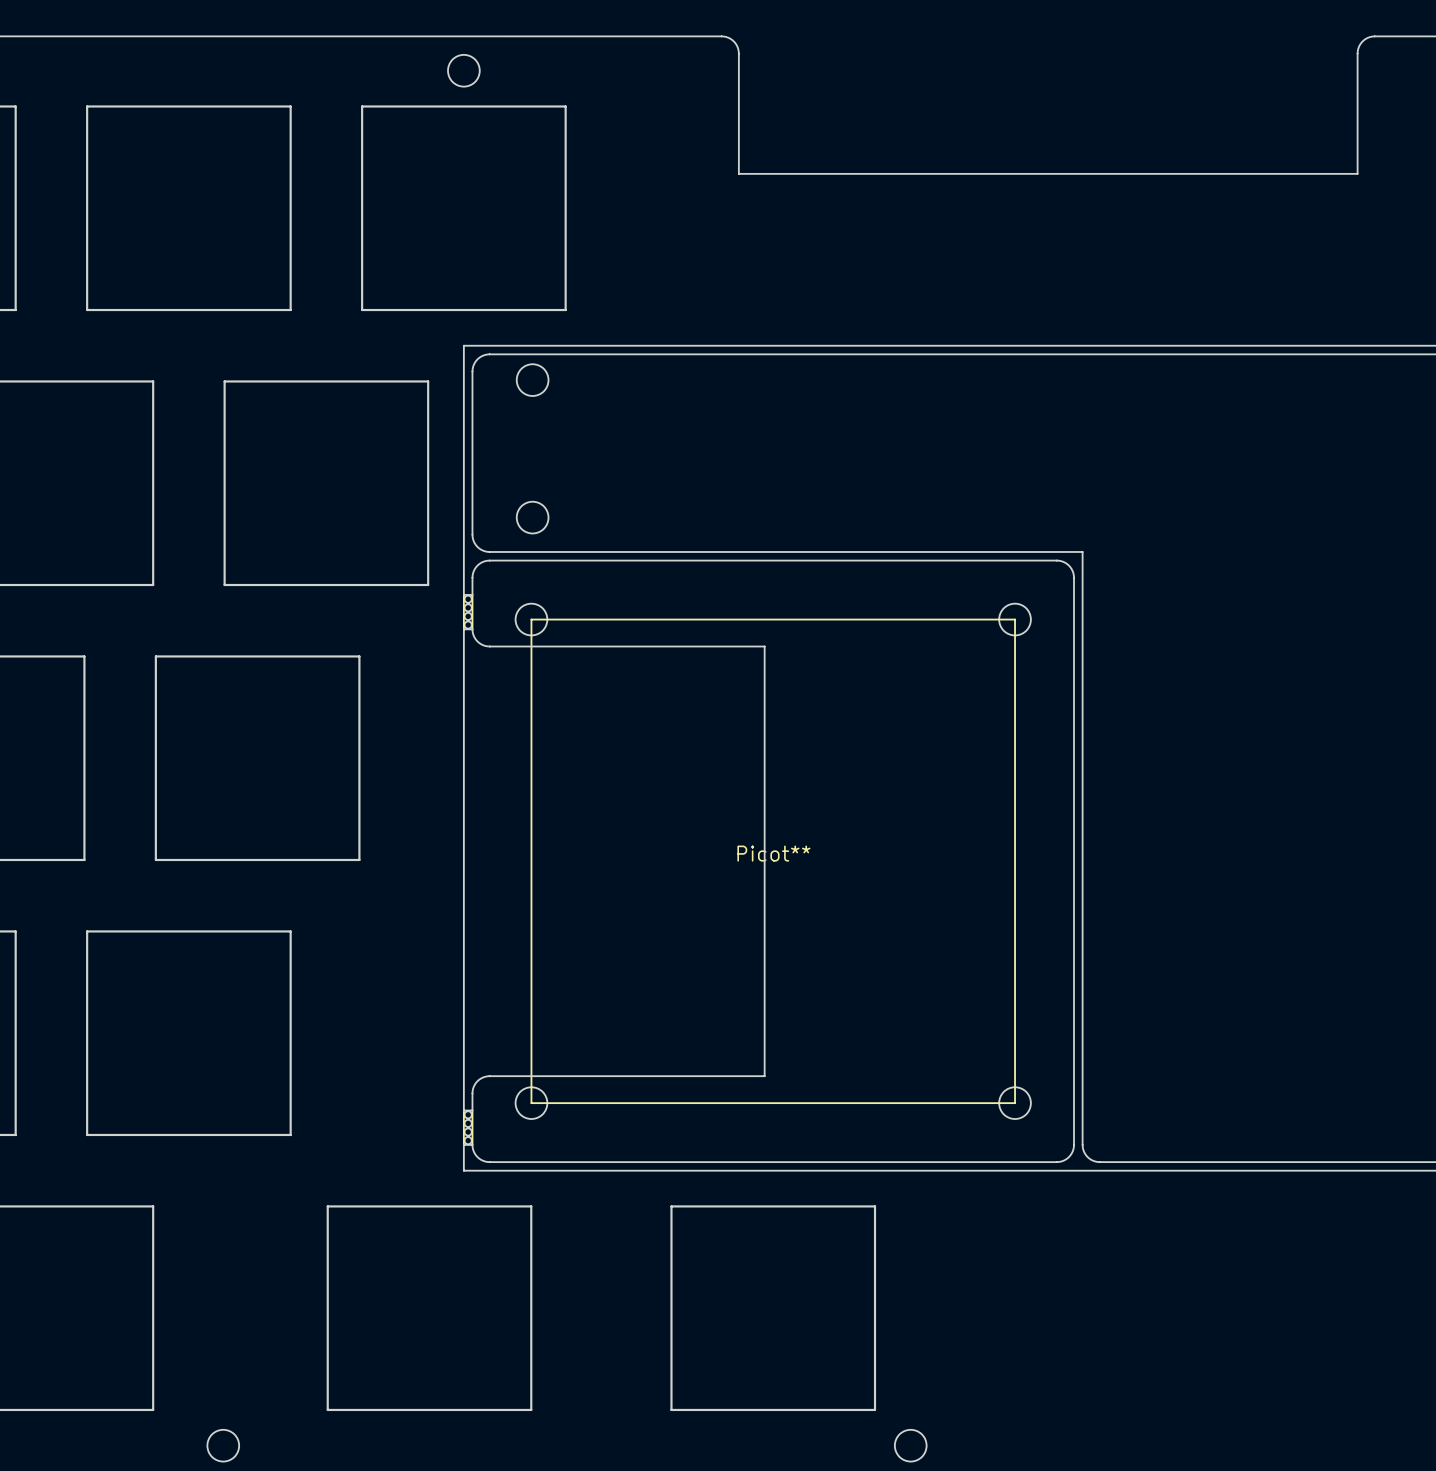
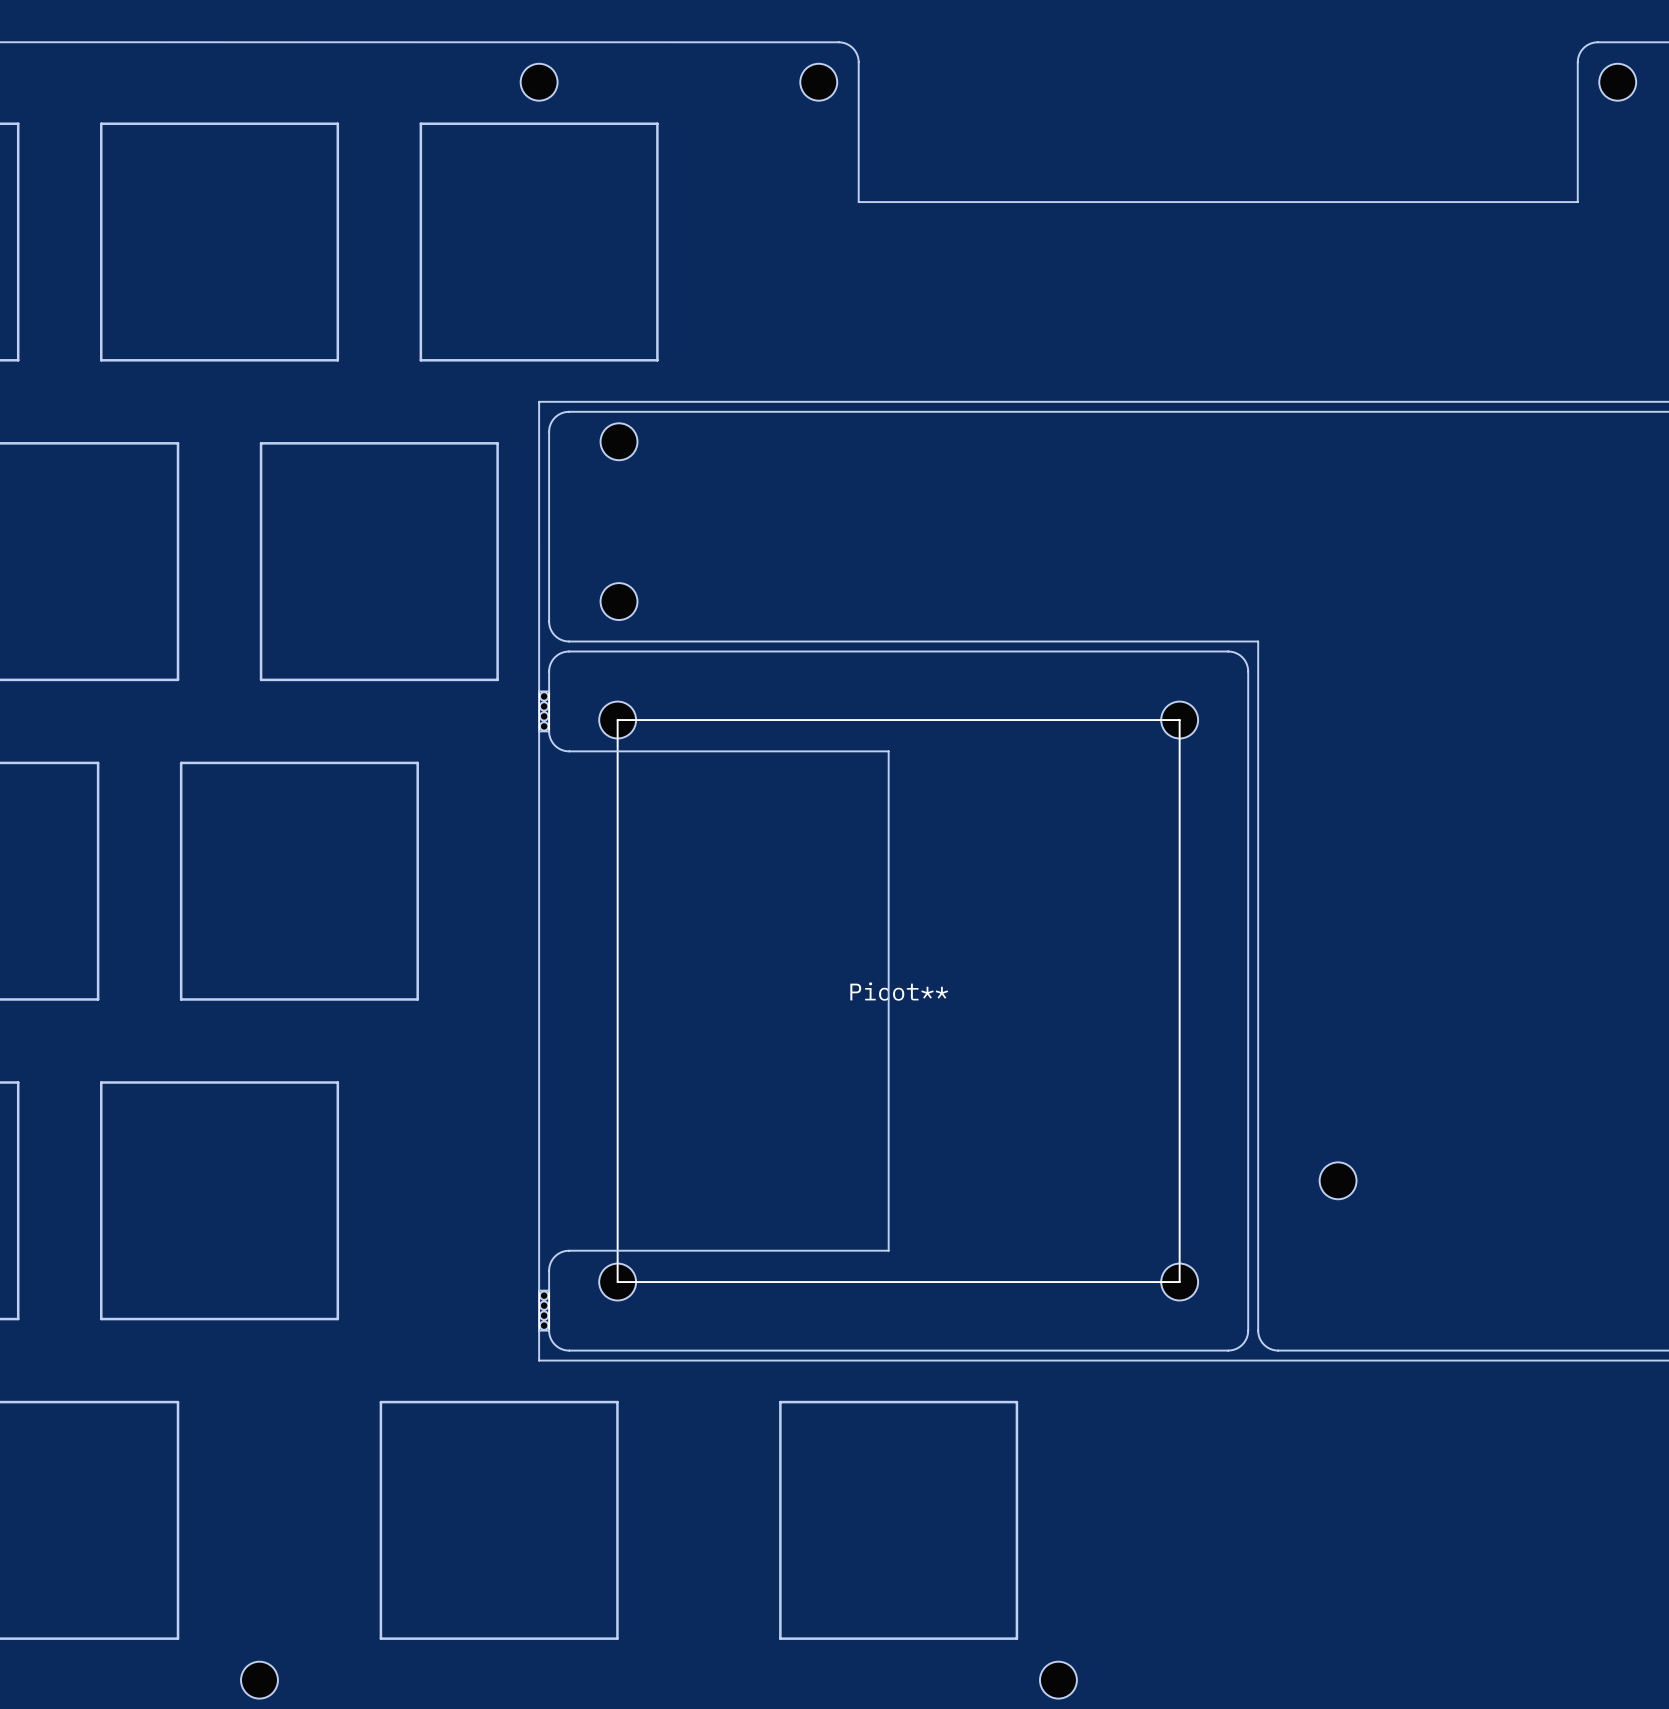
part: none -> (818, 82)
part: none -> (1617, 82)
part: none -> (1338, 1180)

